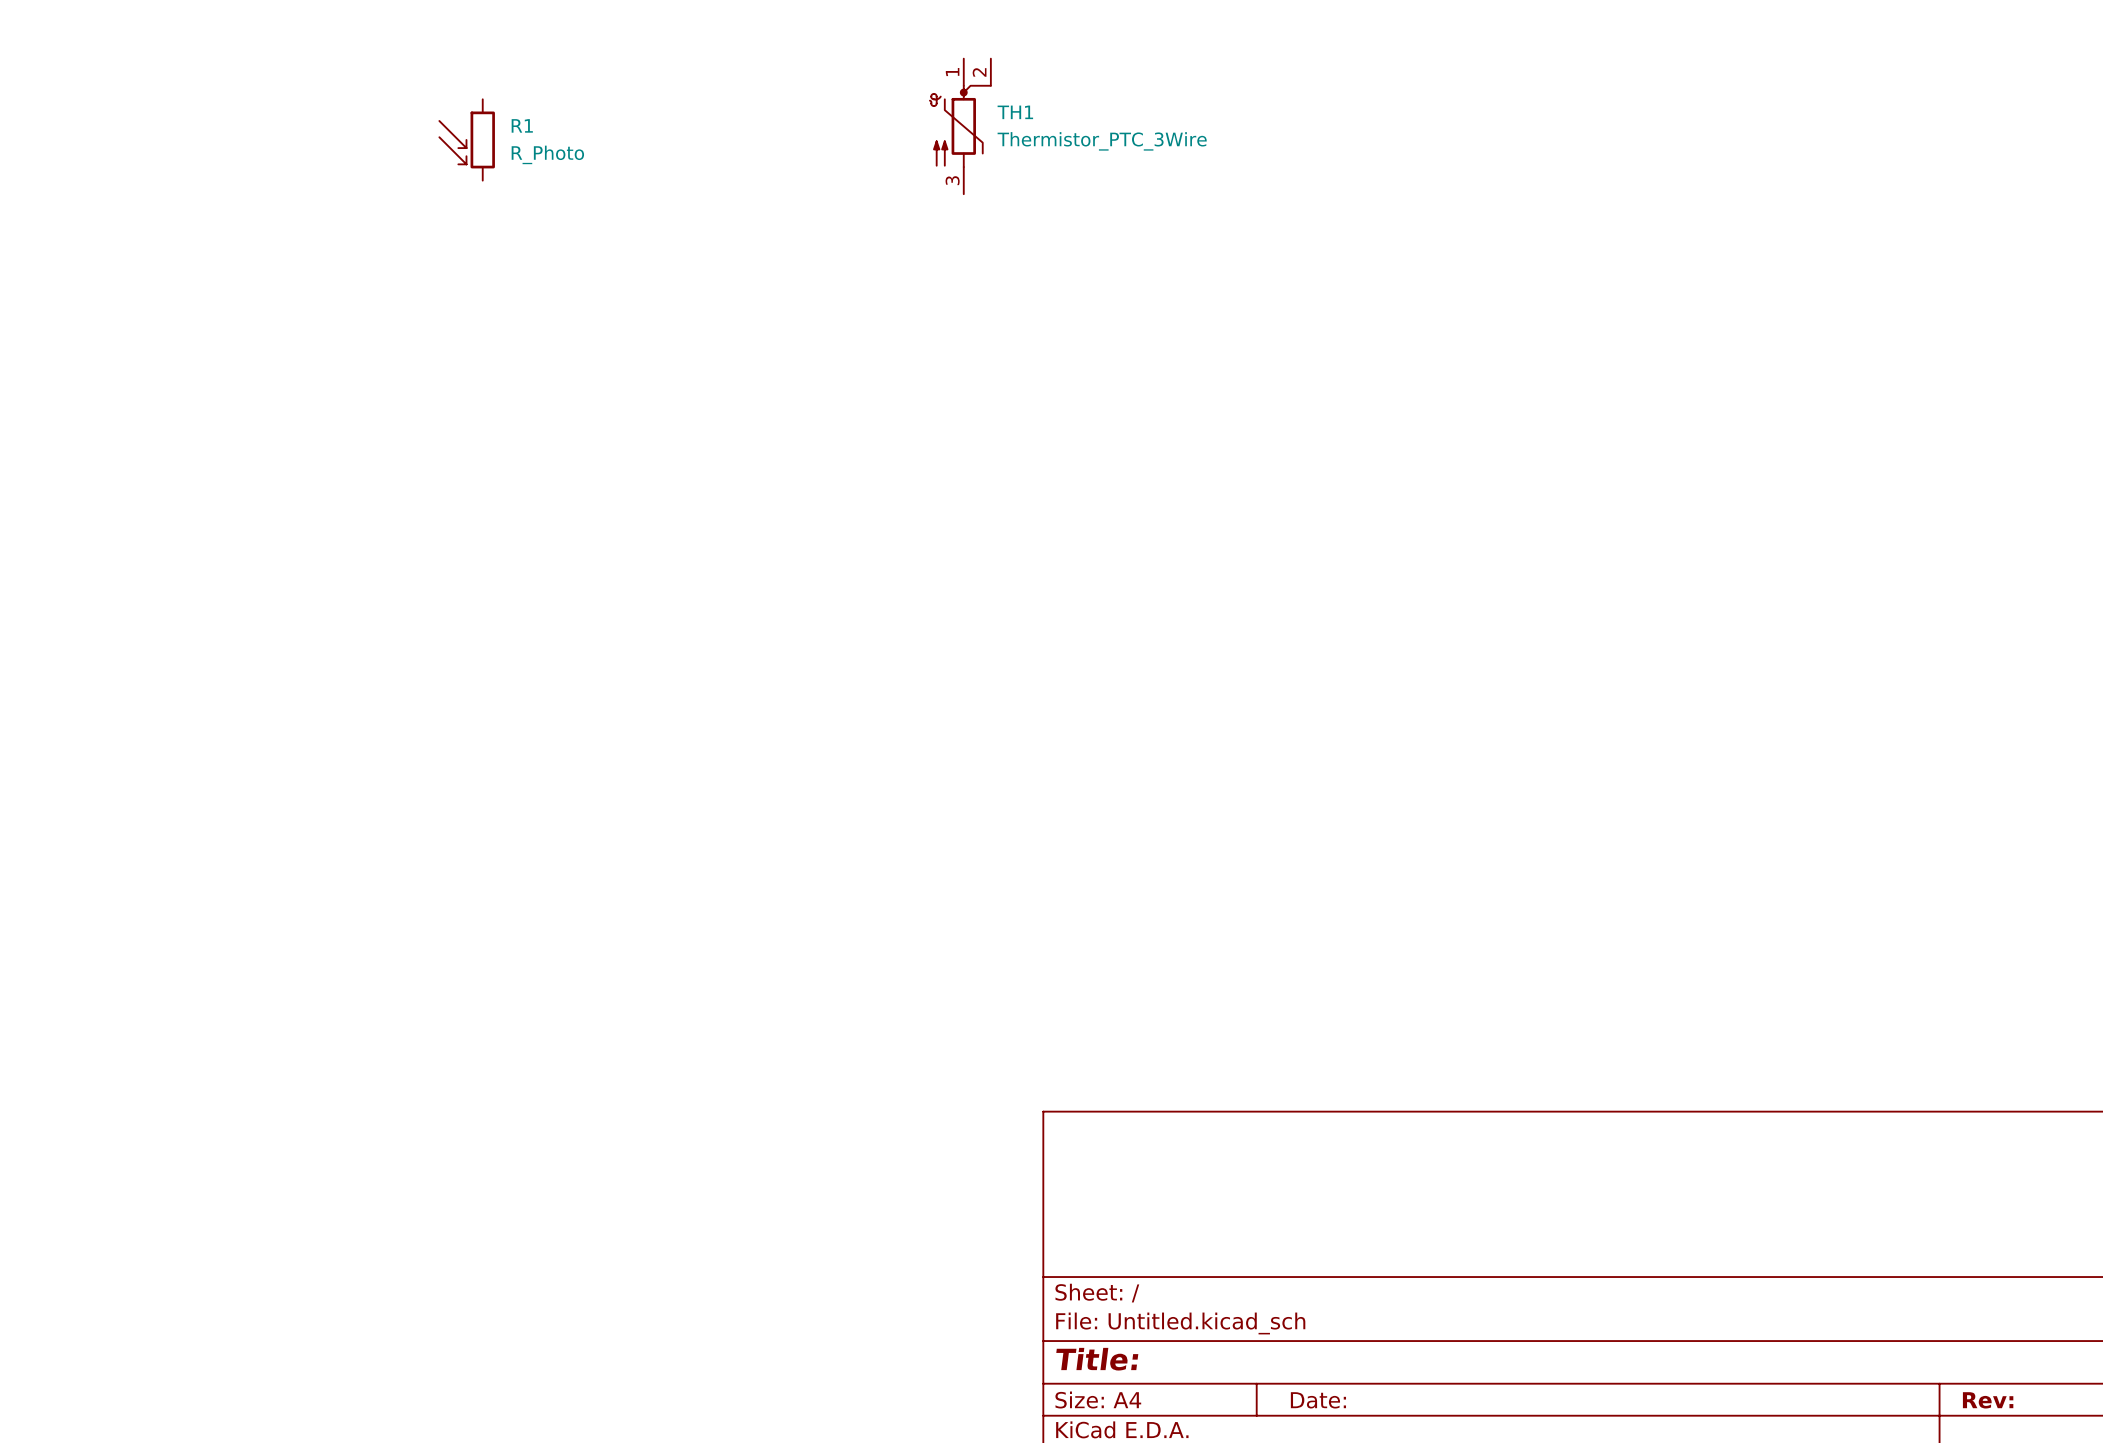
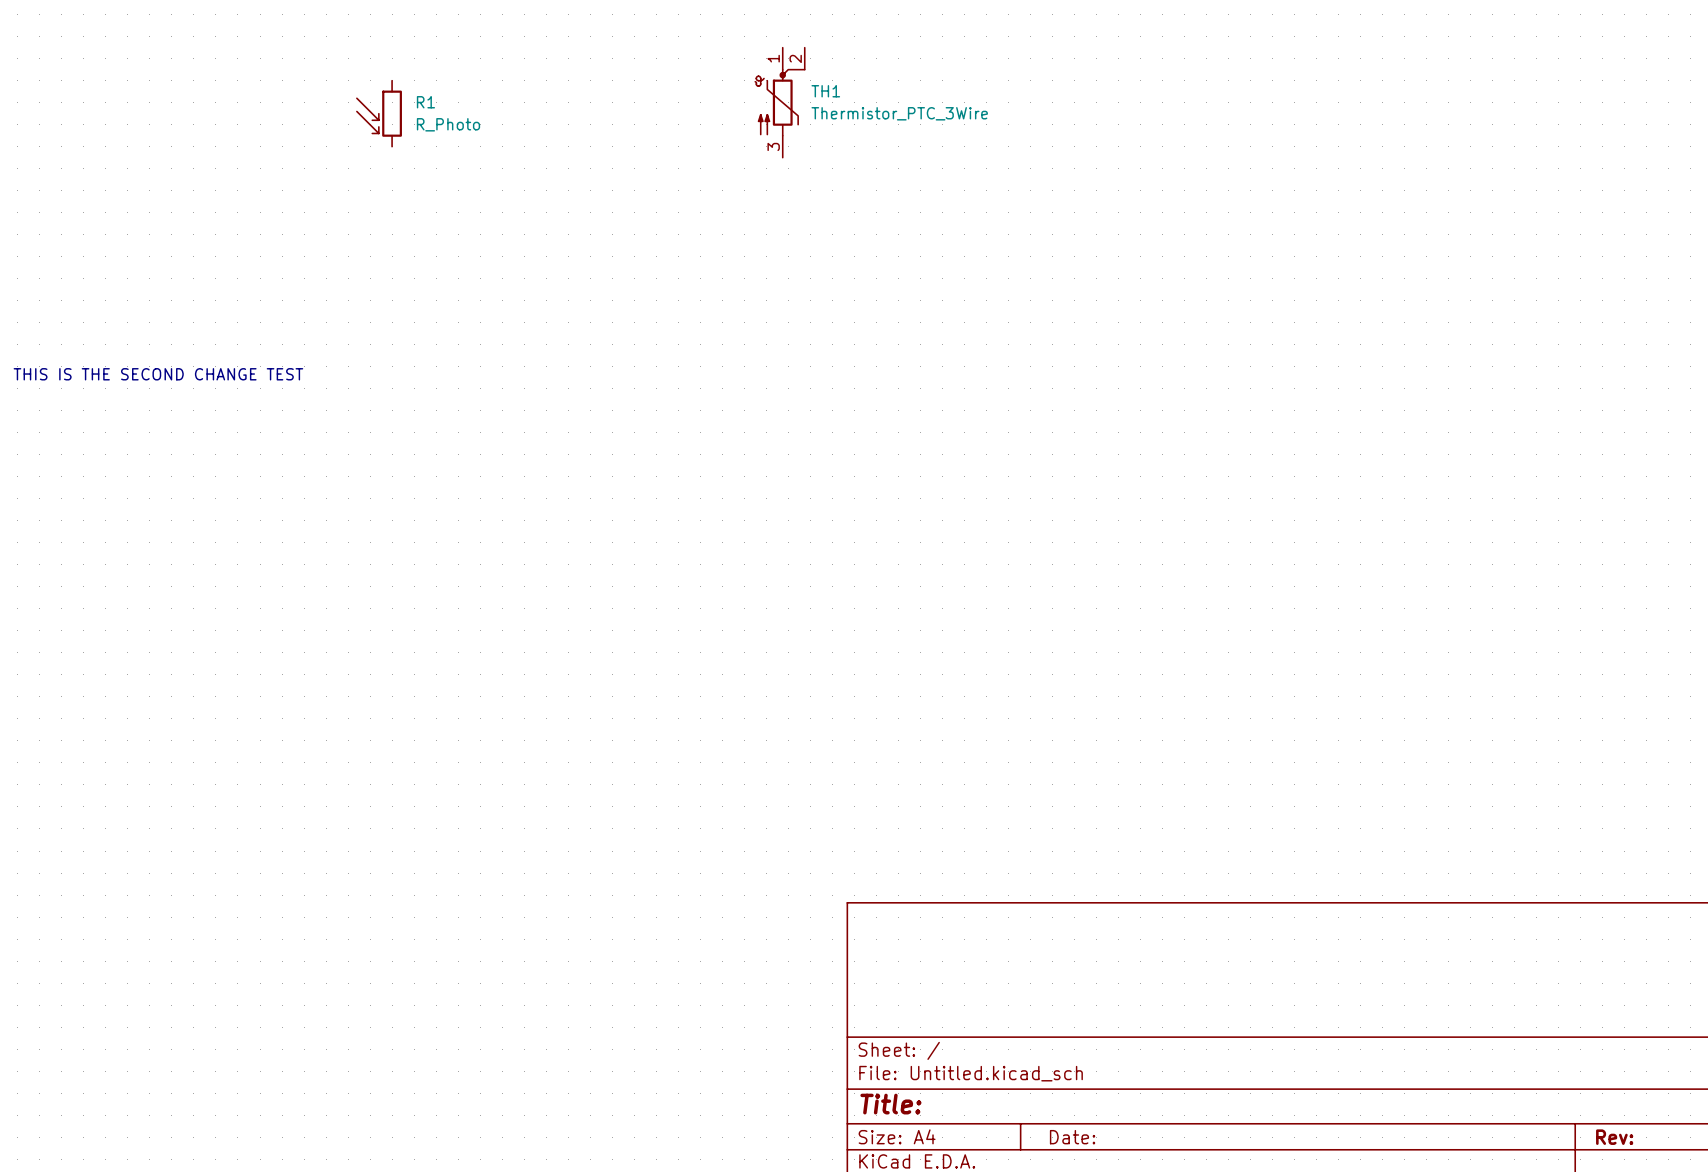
text: none -> THIS IS THE SECOND CHANGE TEST (158, 374)

